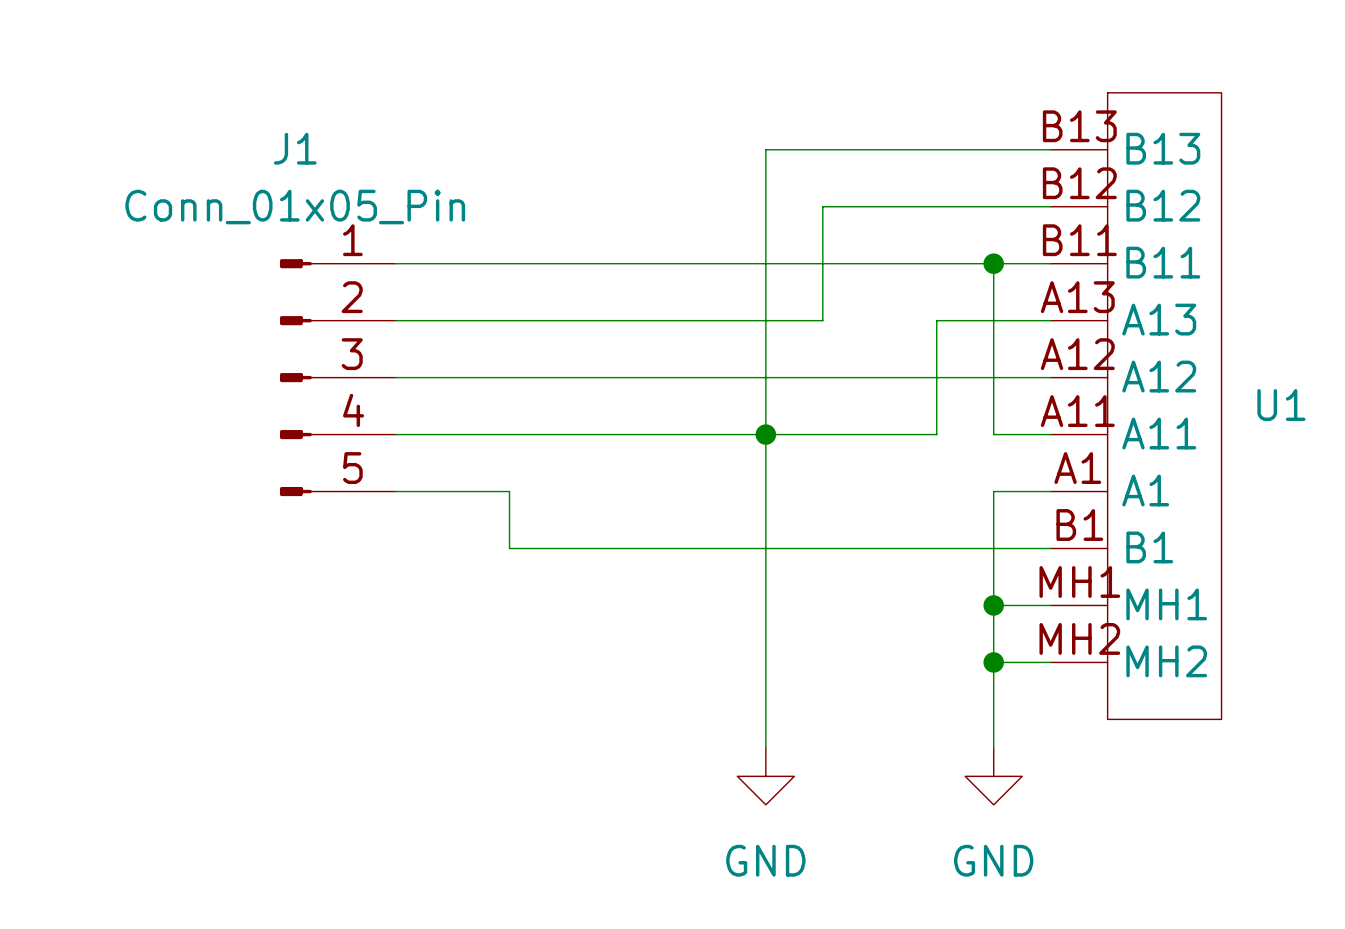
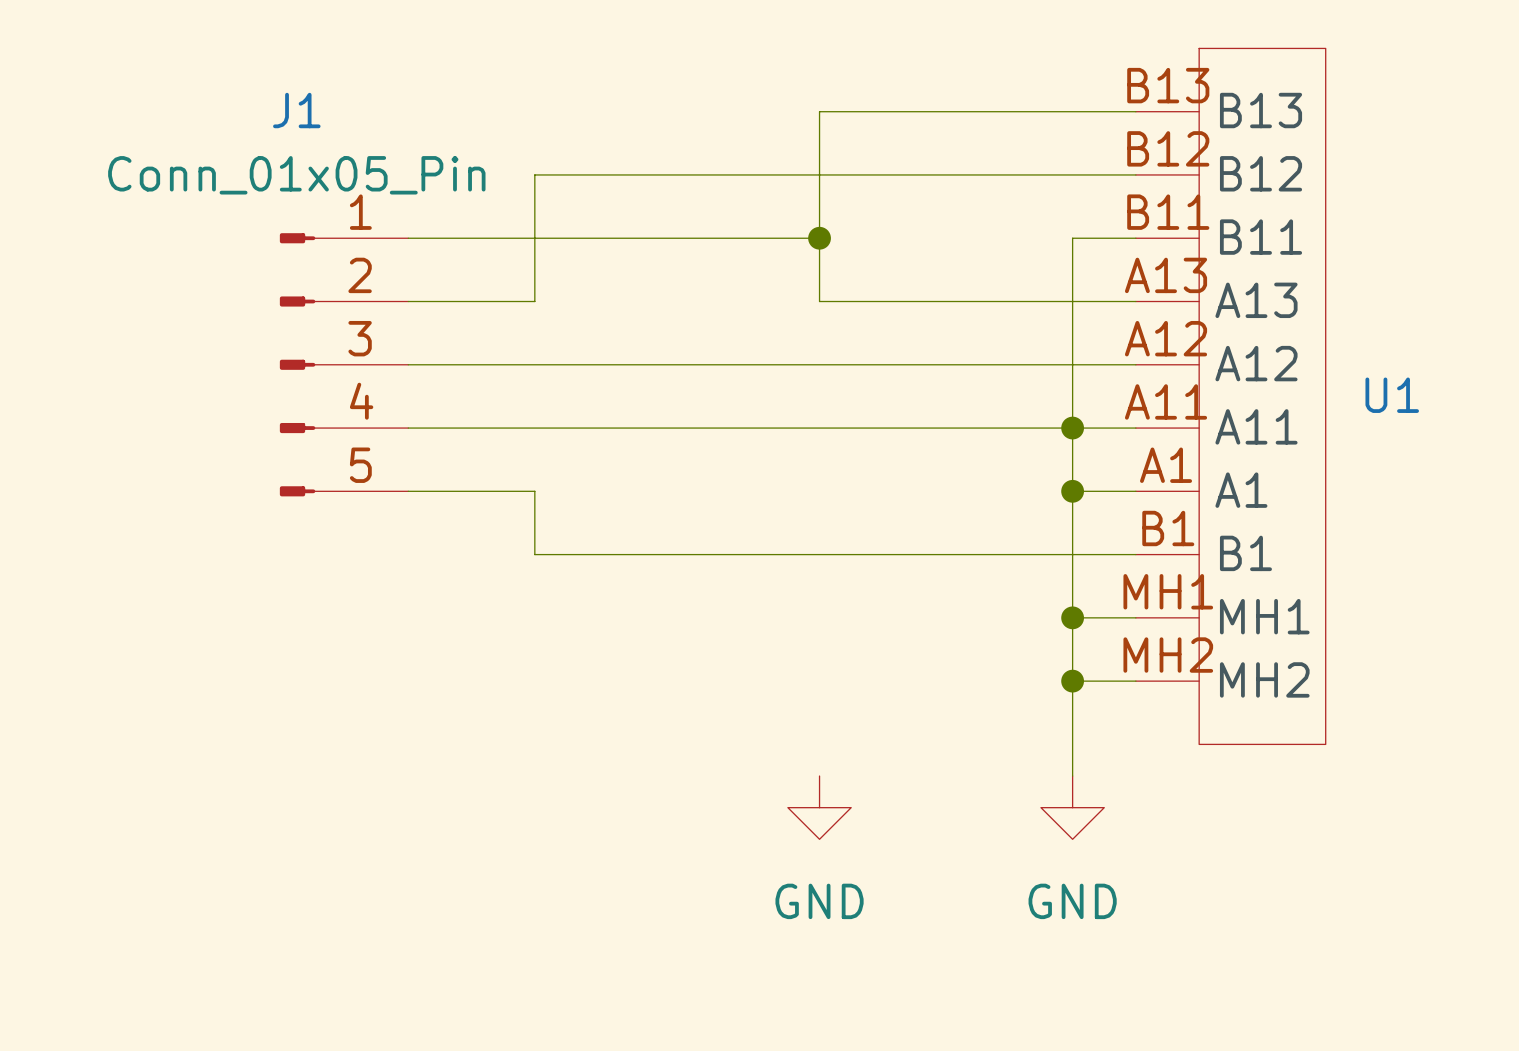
wire: (822, 206) (822, 320) -> (882, 174) (534, 174) (534, 301)
wire: (765, 263) (993, 263) -> none
junction: none -> (819, 238)
junction: (993, 263) -> none
wire: (509, 320) (765, 320) (765, 747) -> none
wire: (936, 320) (936, 434) -> (1009, 301) (882, 301)
junction: (765, 434) -> none
wire: none -> (1009, 428) (1072, 428) (1072, 491)
junction: none -> (1072, 428)
junction: none -> (1072, 491)

